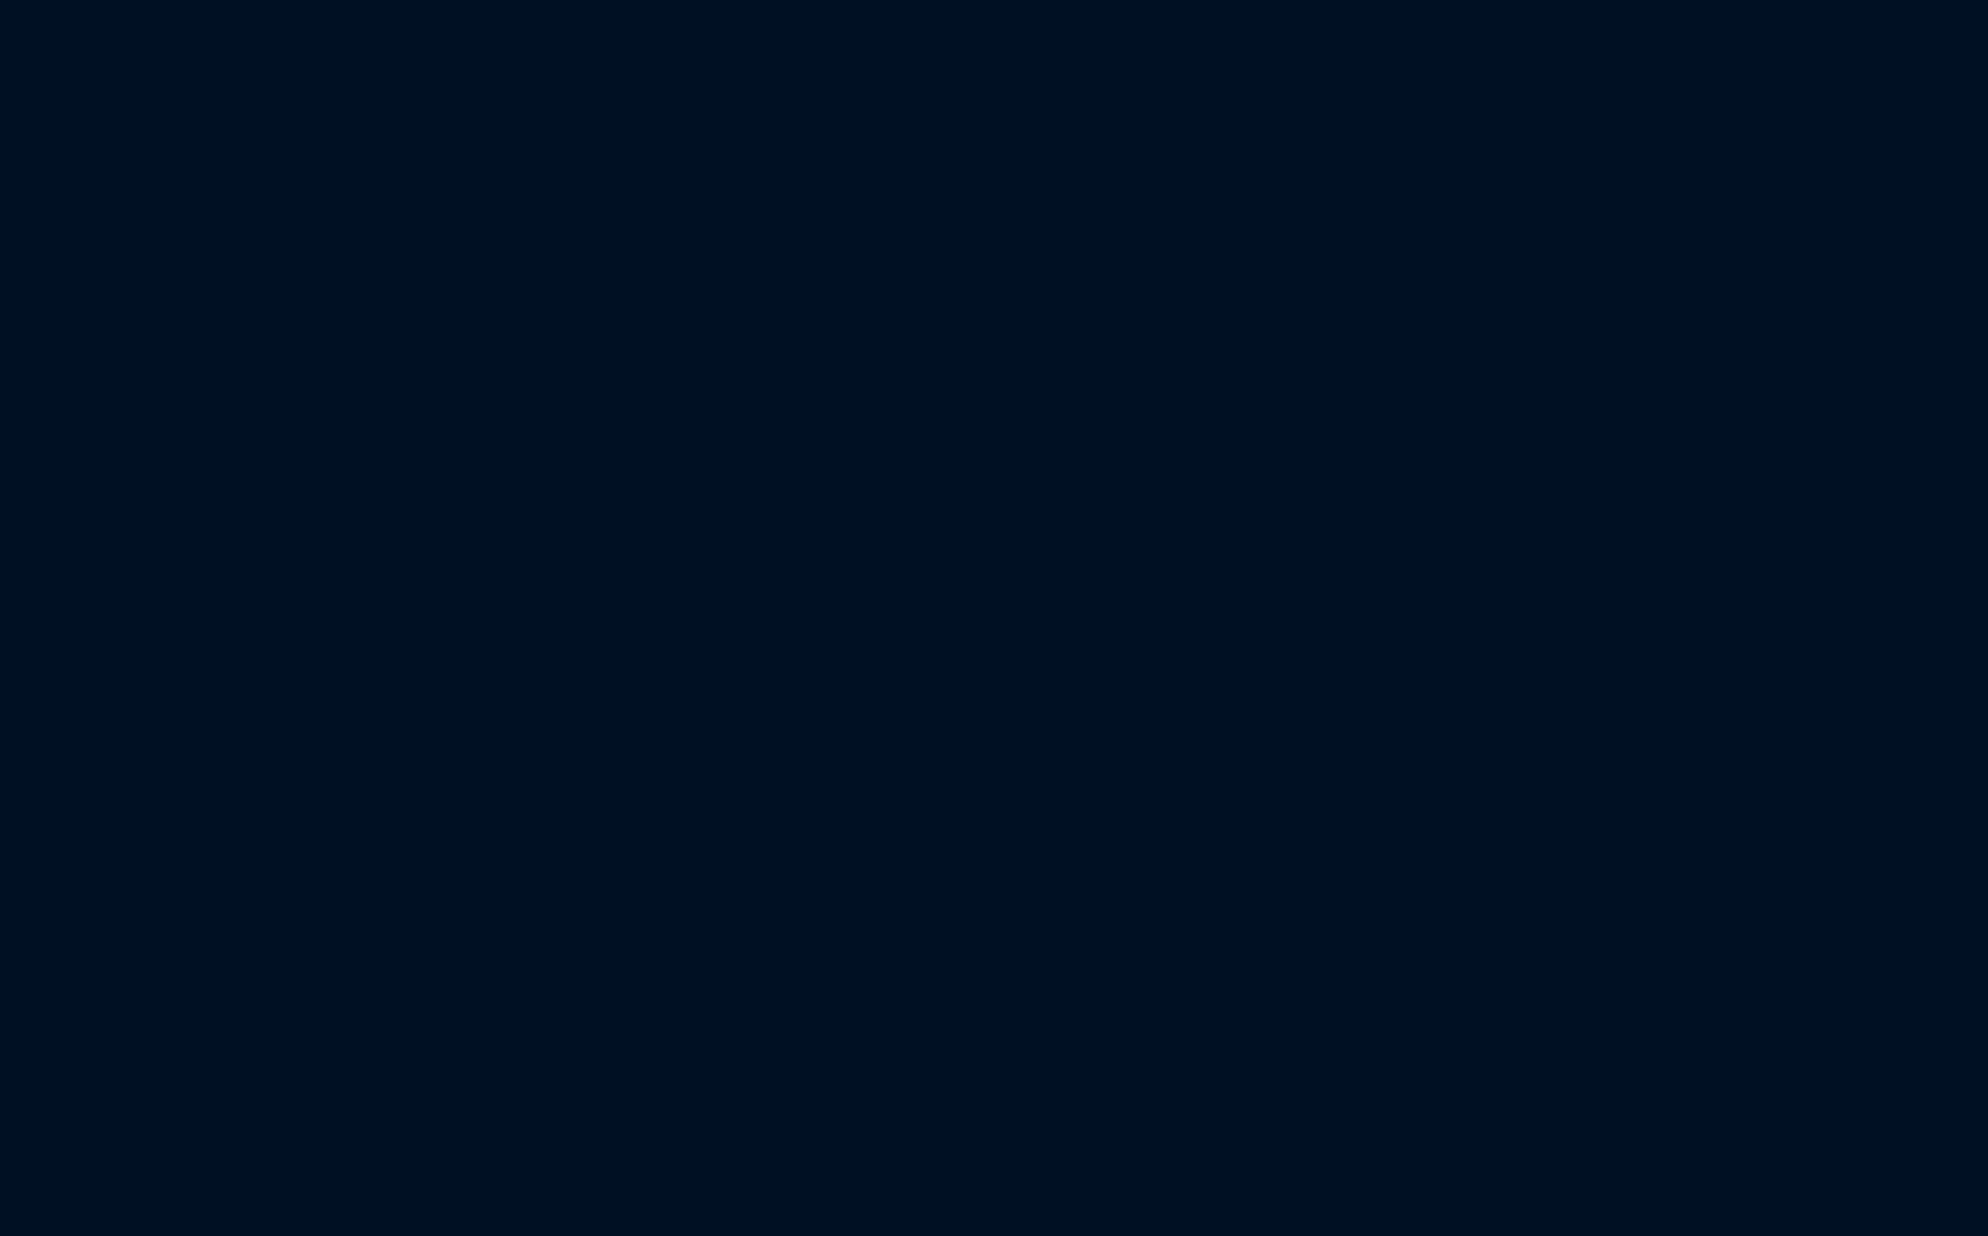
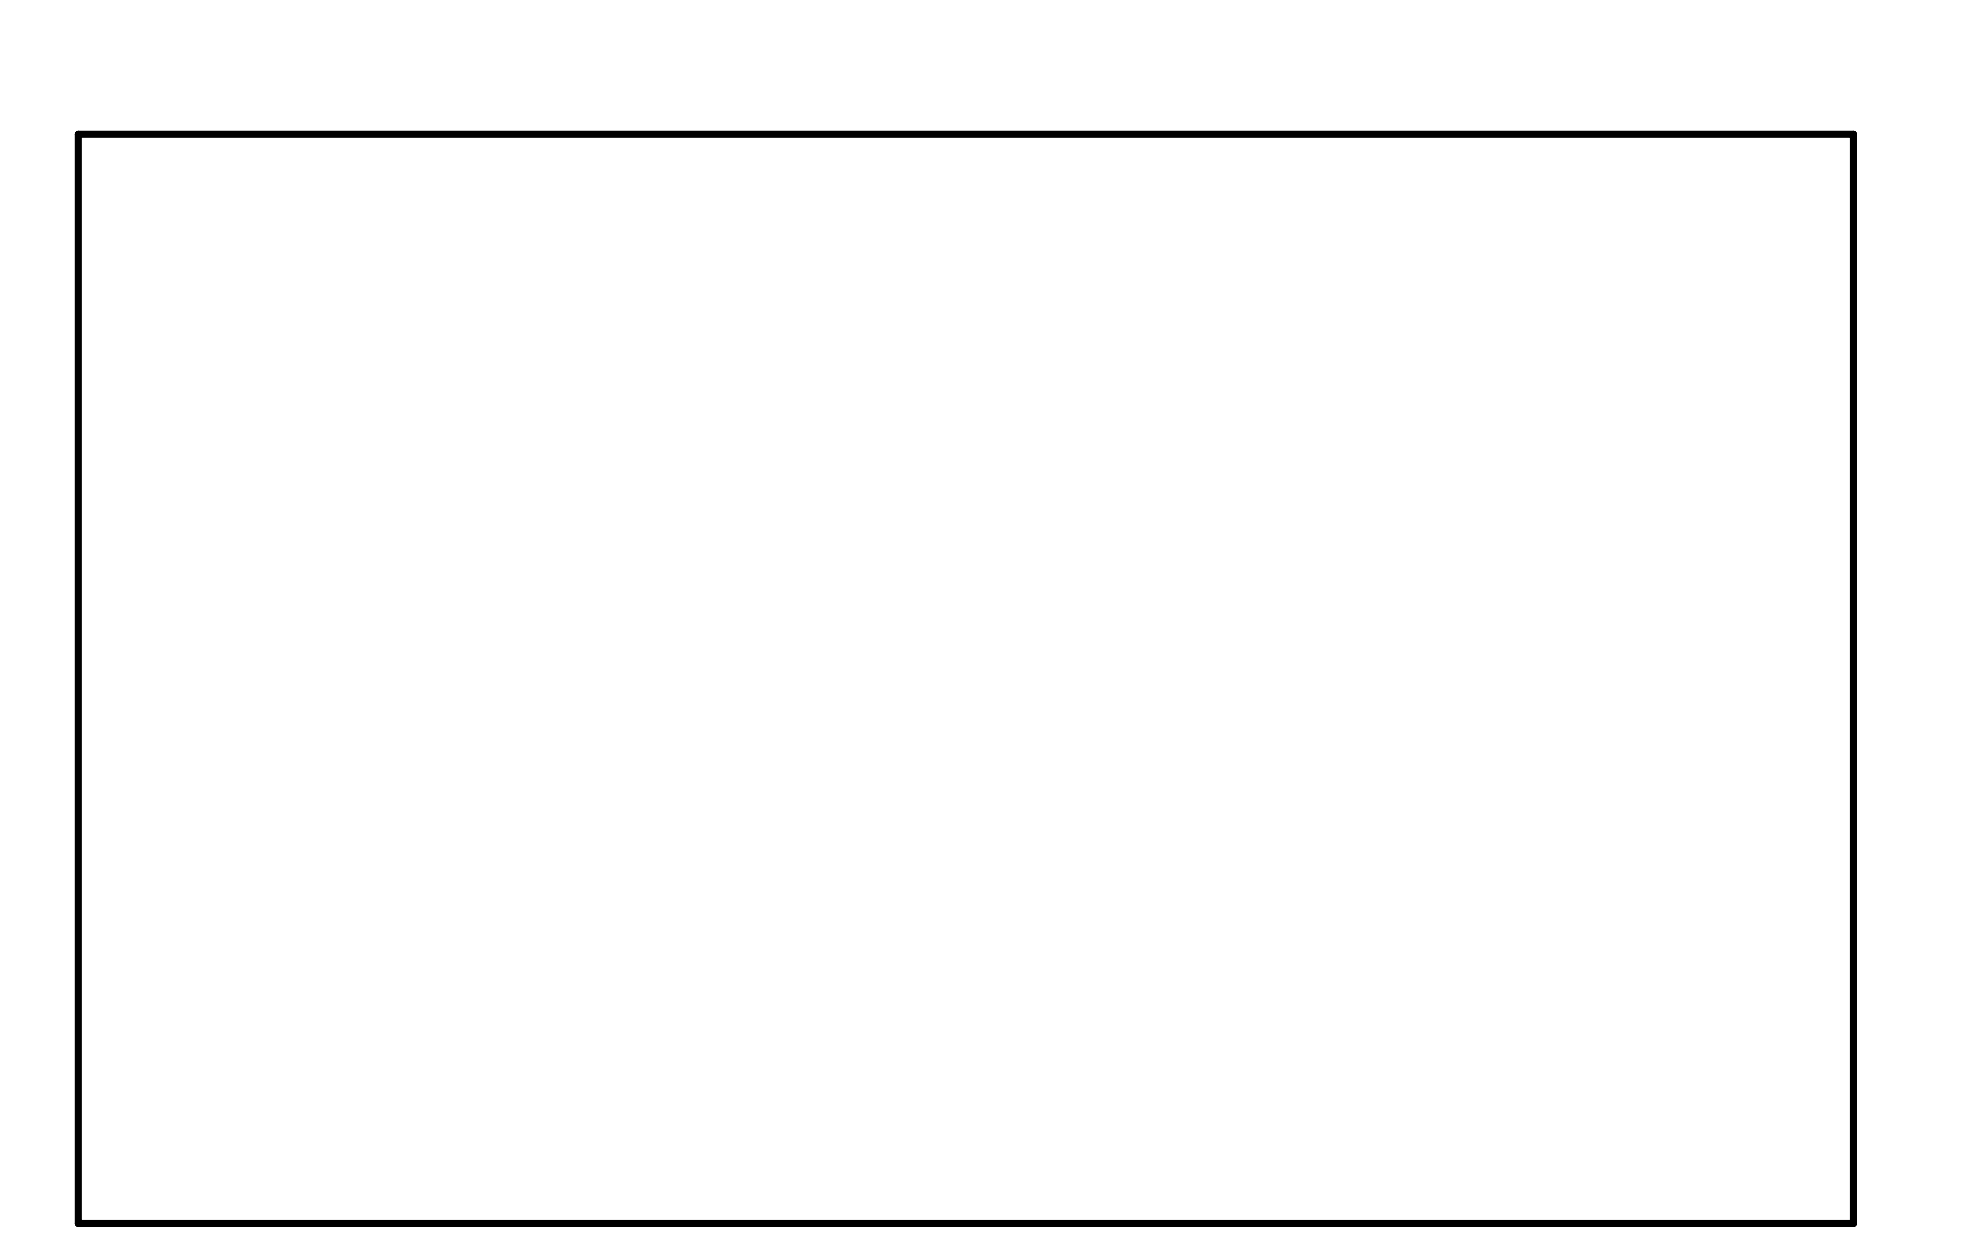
board edge: none -> (1853, 134) (78, 134) (78, 1223) (1853, 1223) (1853, 134)

